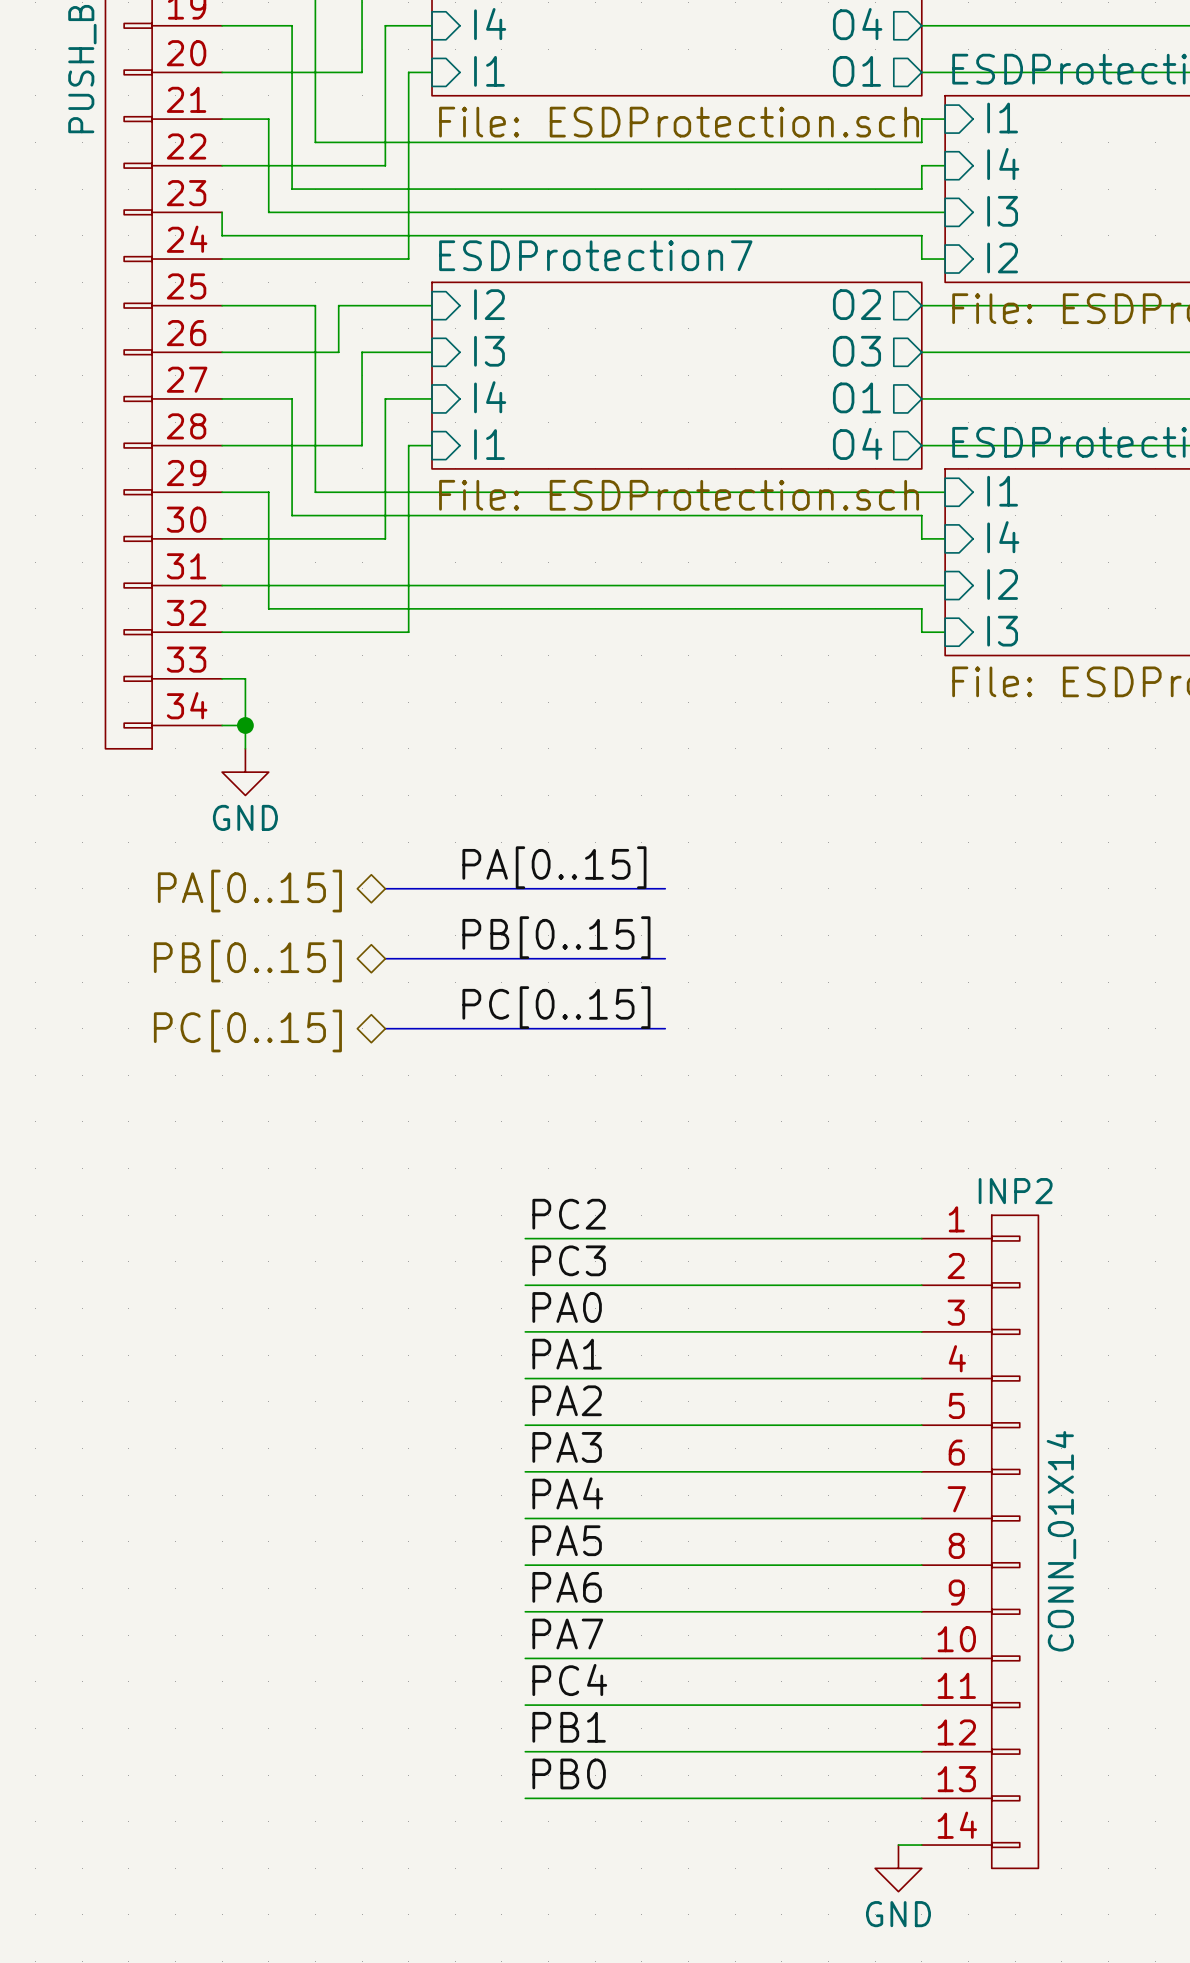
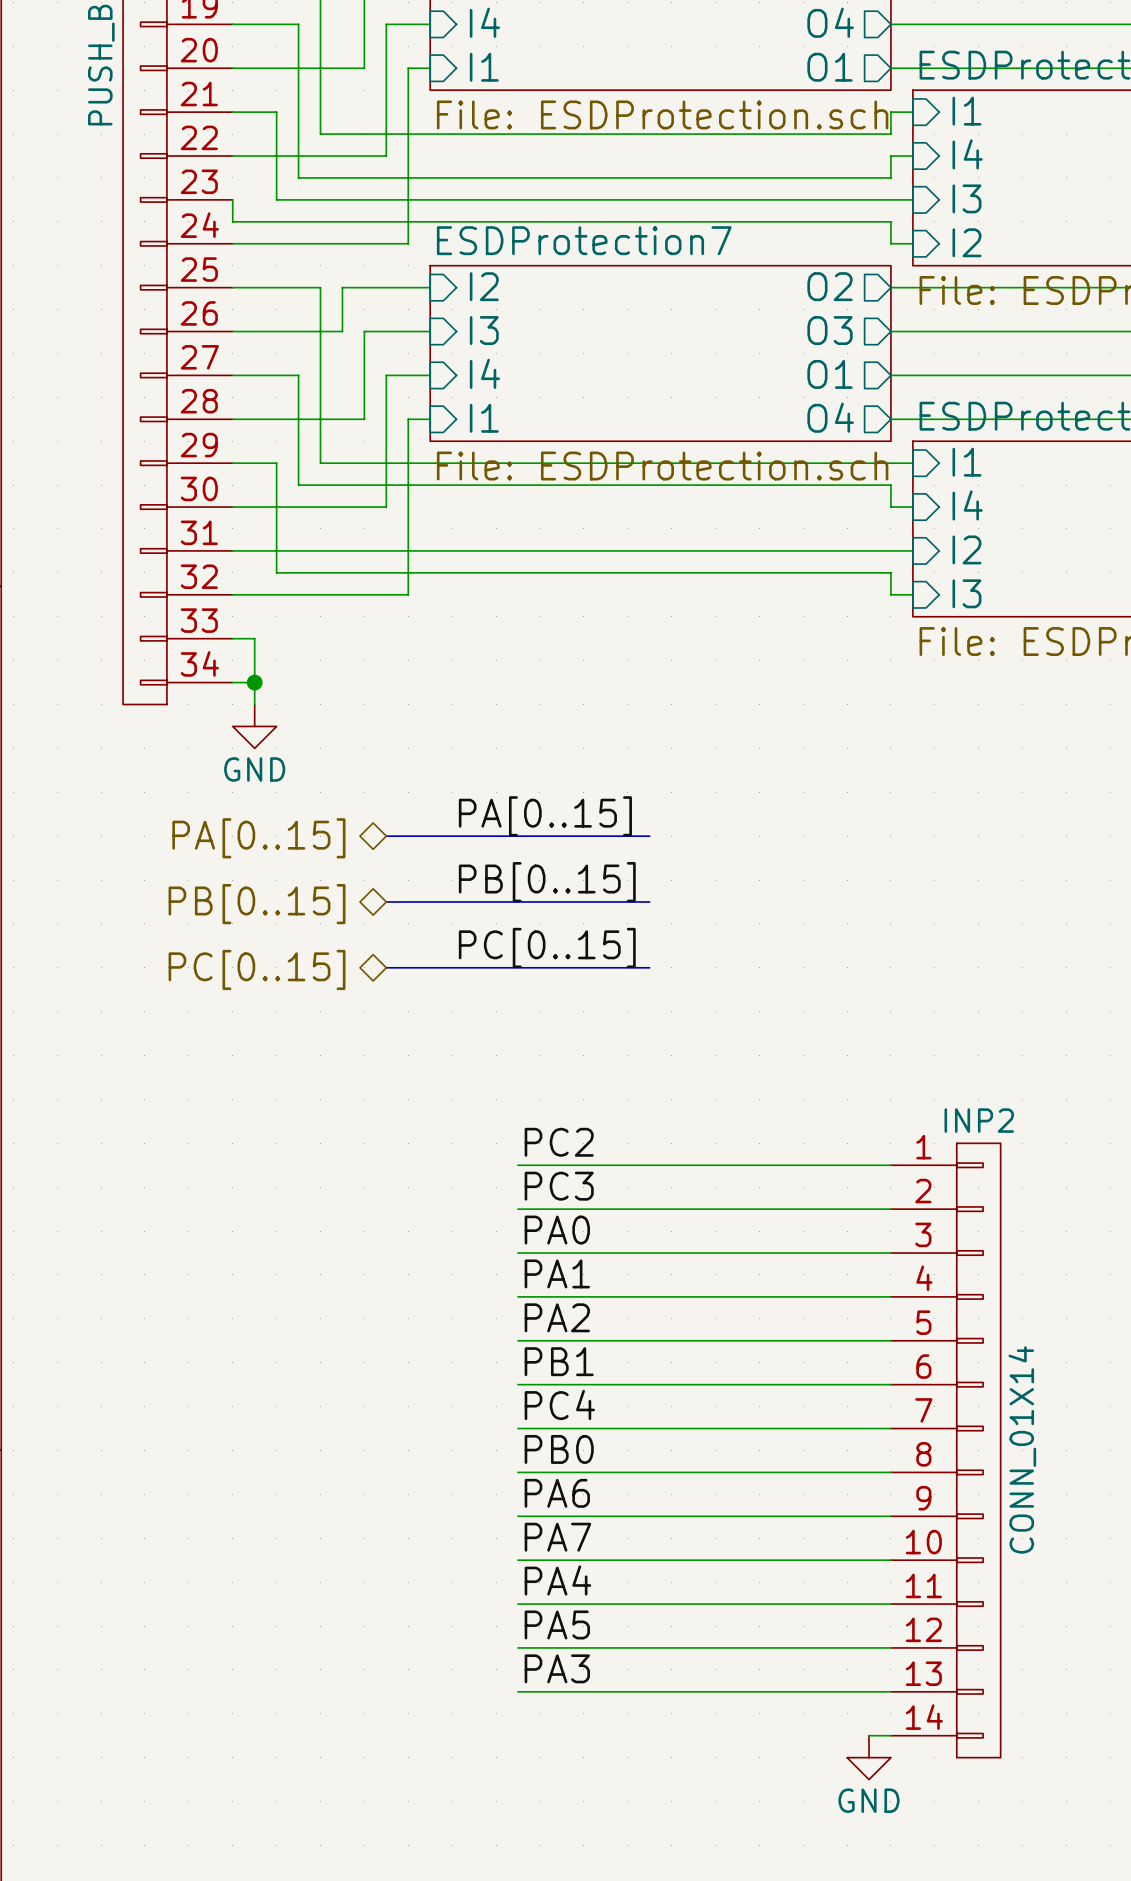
label: PA3 (567, 1447) -> PB1 (559, 1361)
label: PA4 (567, 1493) -> PC4 (559, 1404)
label: PA5 (567, 1540) -> PB0 (559, 1449)
label: PC4 (569, 1680) -> PA4 (557, 1580)
label: PB1 (569, 1727) -> PA5 (557, 1624)
label: PB0 (569, 1773) -> PA3 (557, 1668)

